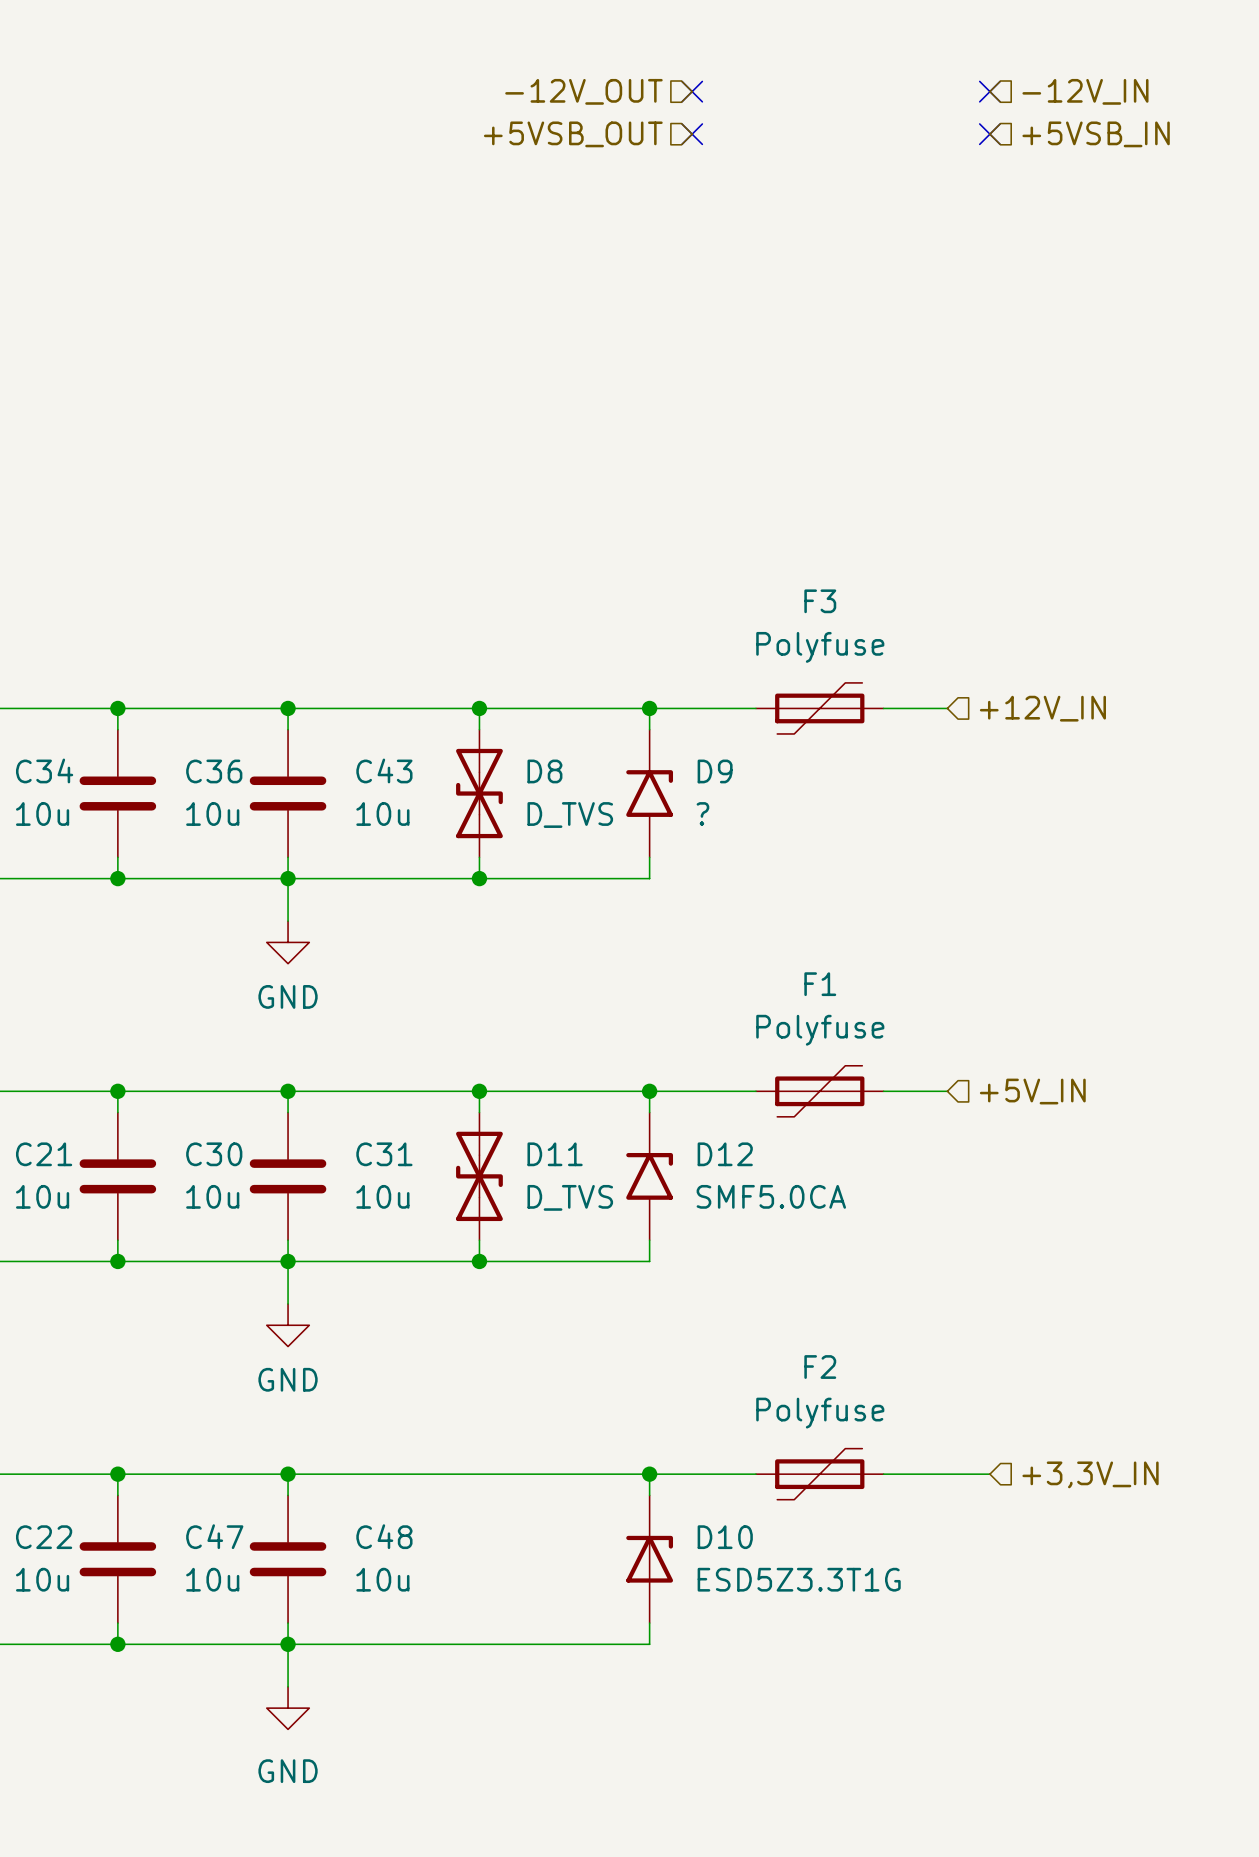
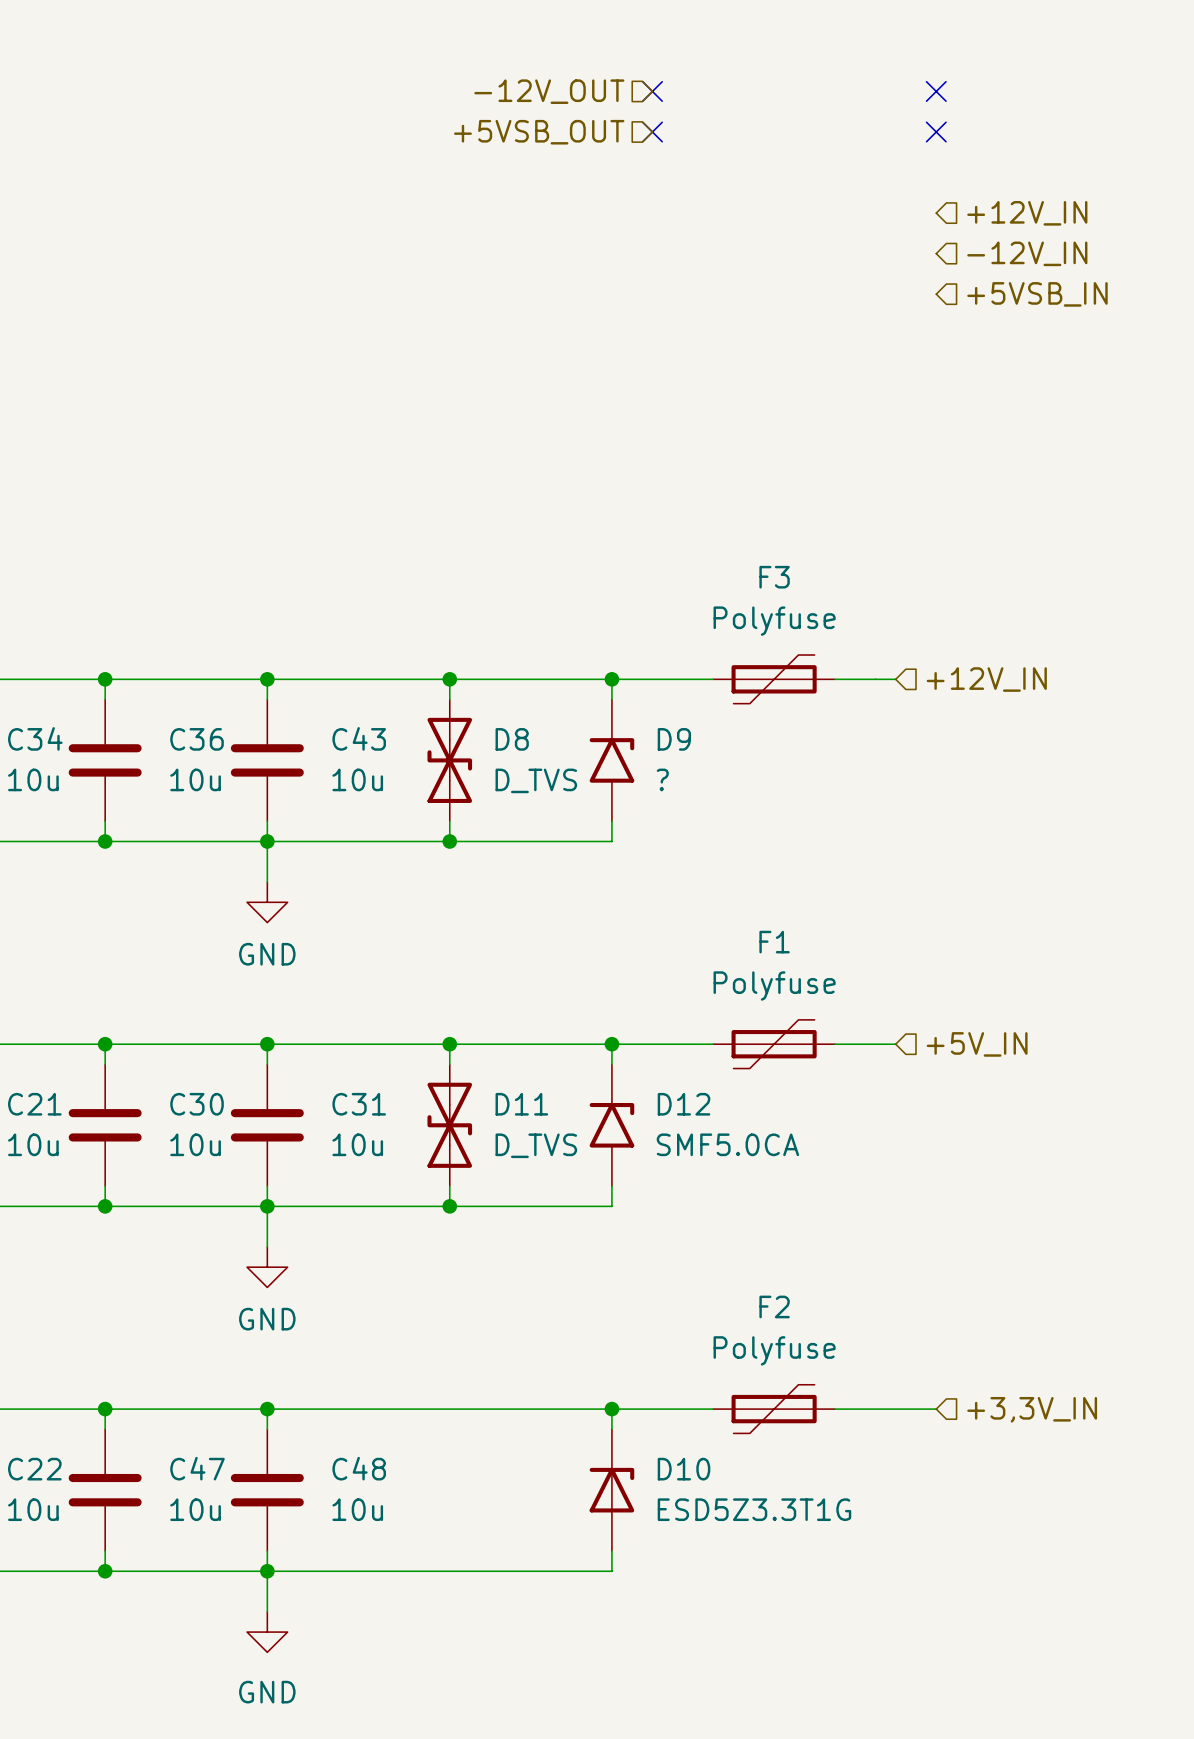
hierarchical label position: -12V_IN (1085, 91) -> -12V_IN (1027, 253)
hierarchical label position: +5VSB_IN (1096, 134) -> +5VSB_IN (1037, 294)
hierarchical label: none -> +12V_IN (1027, 213)

